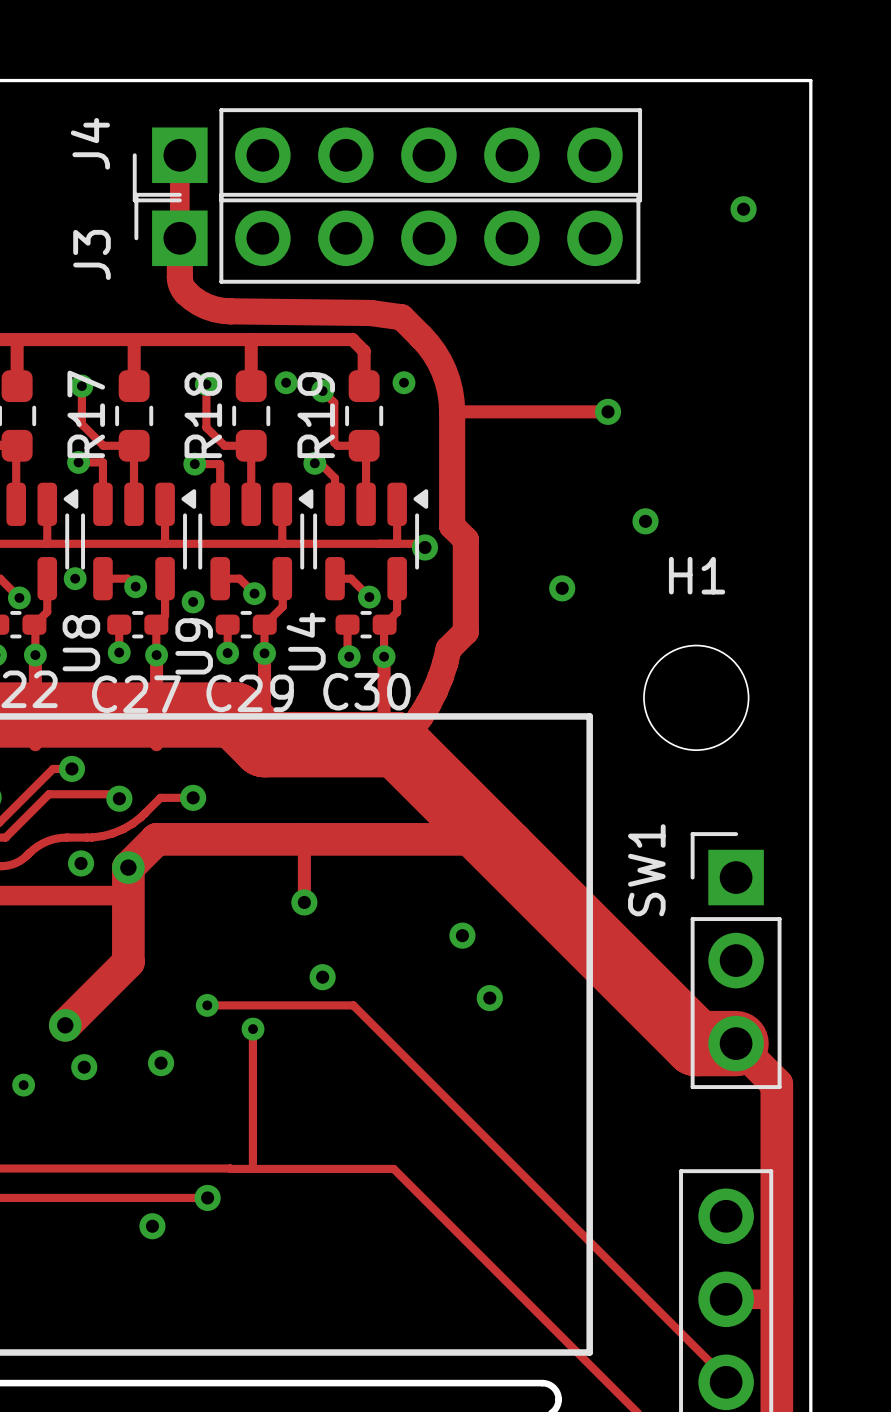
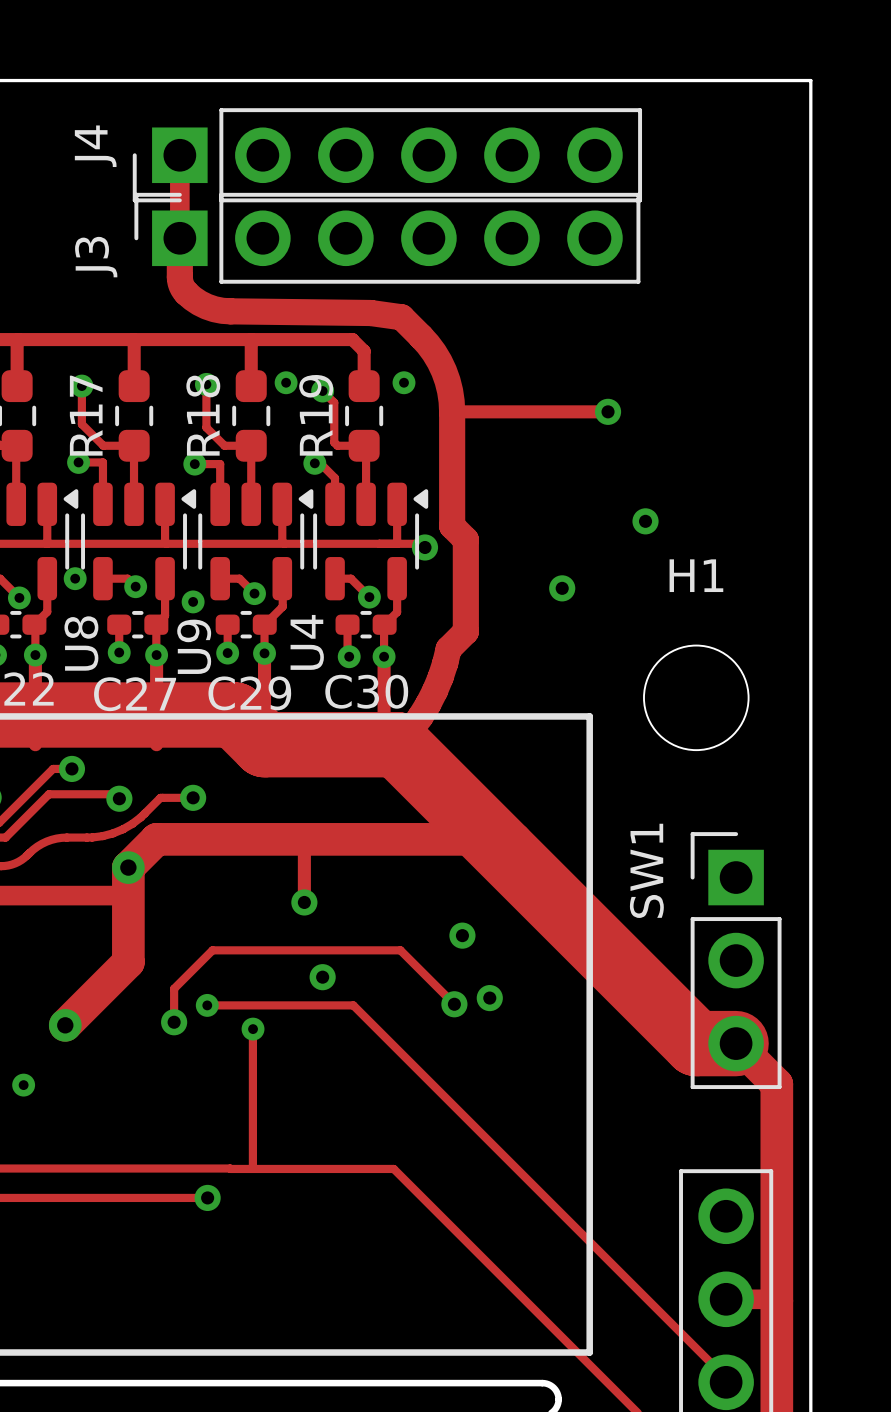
via: (743, 209) -> none
via: (81, 863) -> none
track: none -> (454, 1004) (400, 950) (212, 950) (174, 988) (174, 1022)
via: none -> (454, 1004)
via position: (161, 1063) -> (174, 1022)
via: (84, 1067) -> none
via: (152, 1226) -> none

